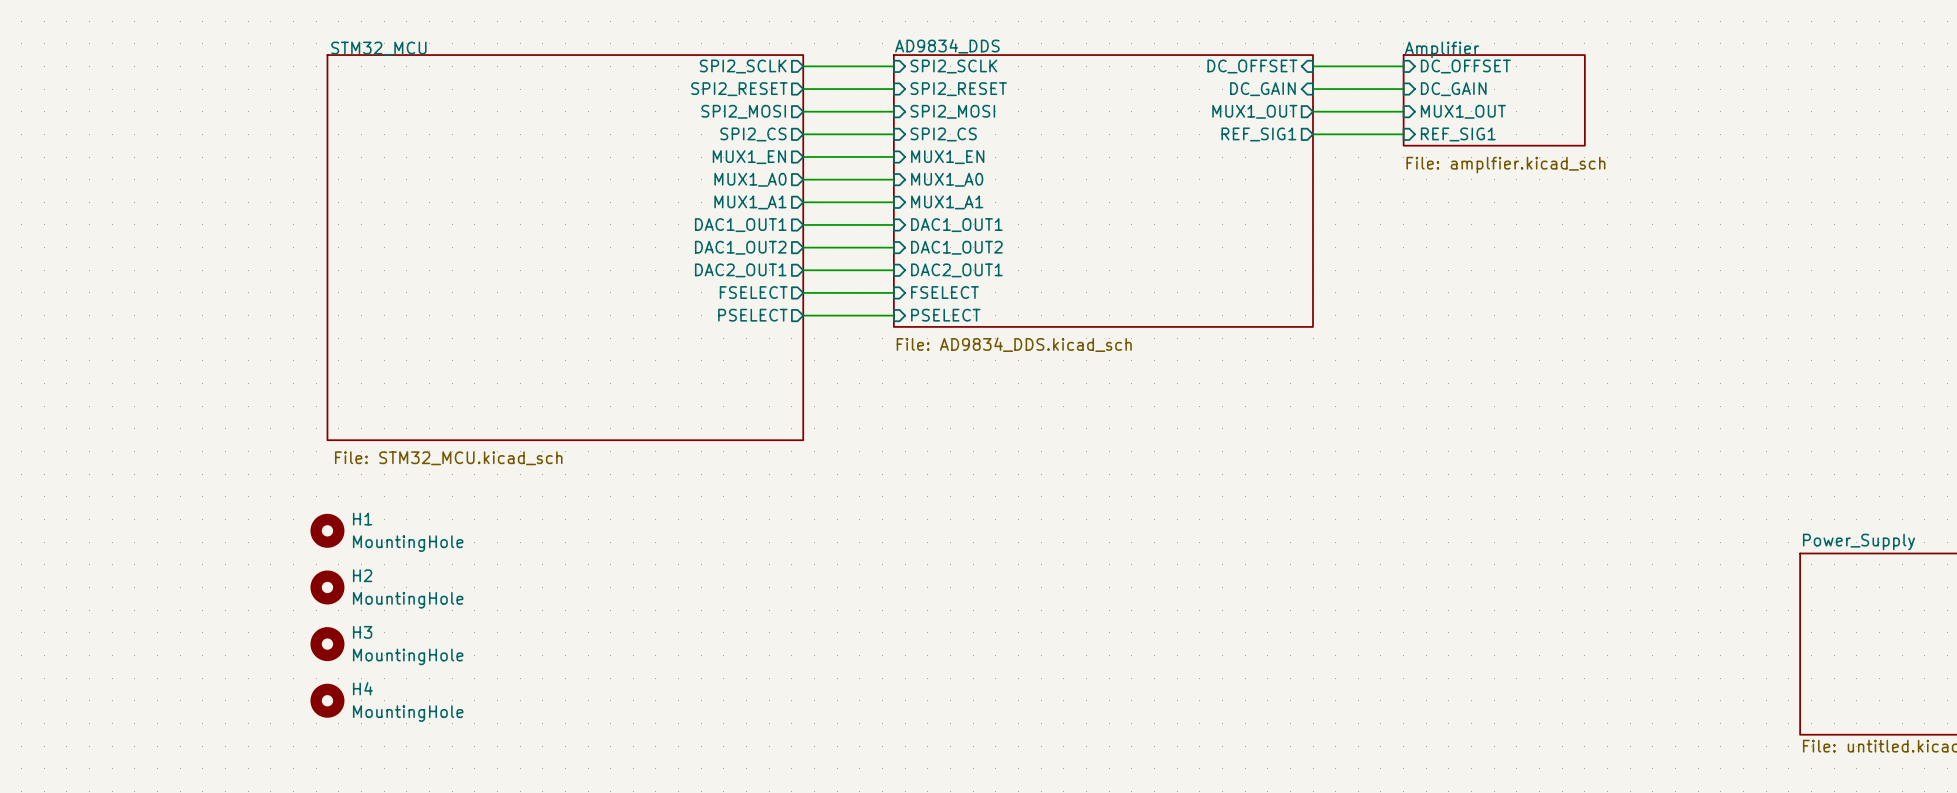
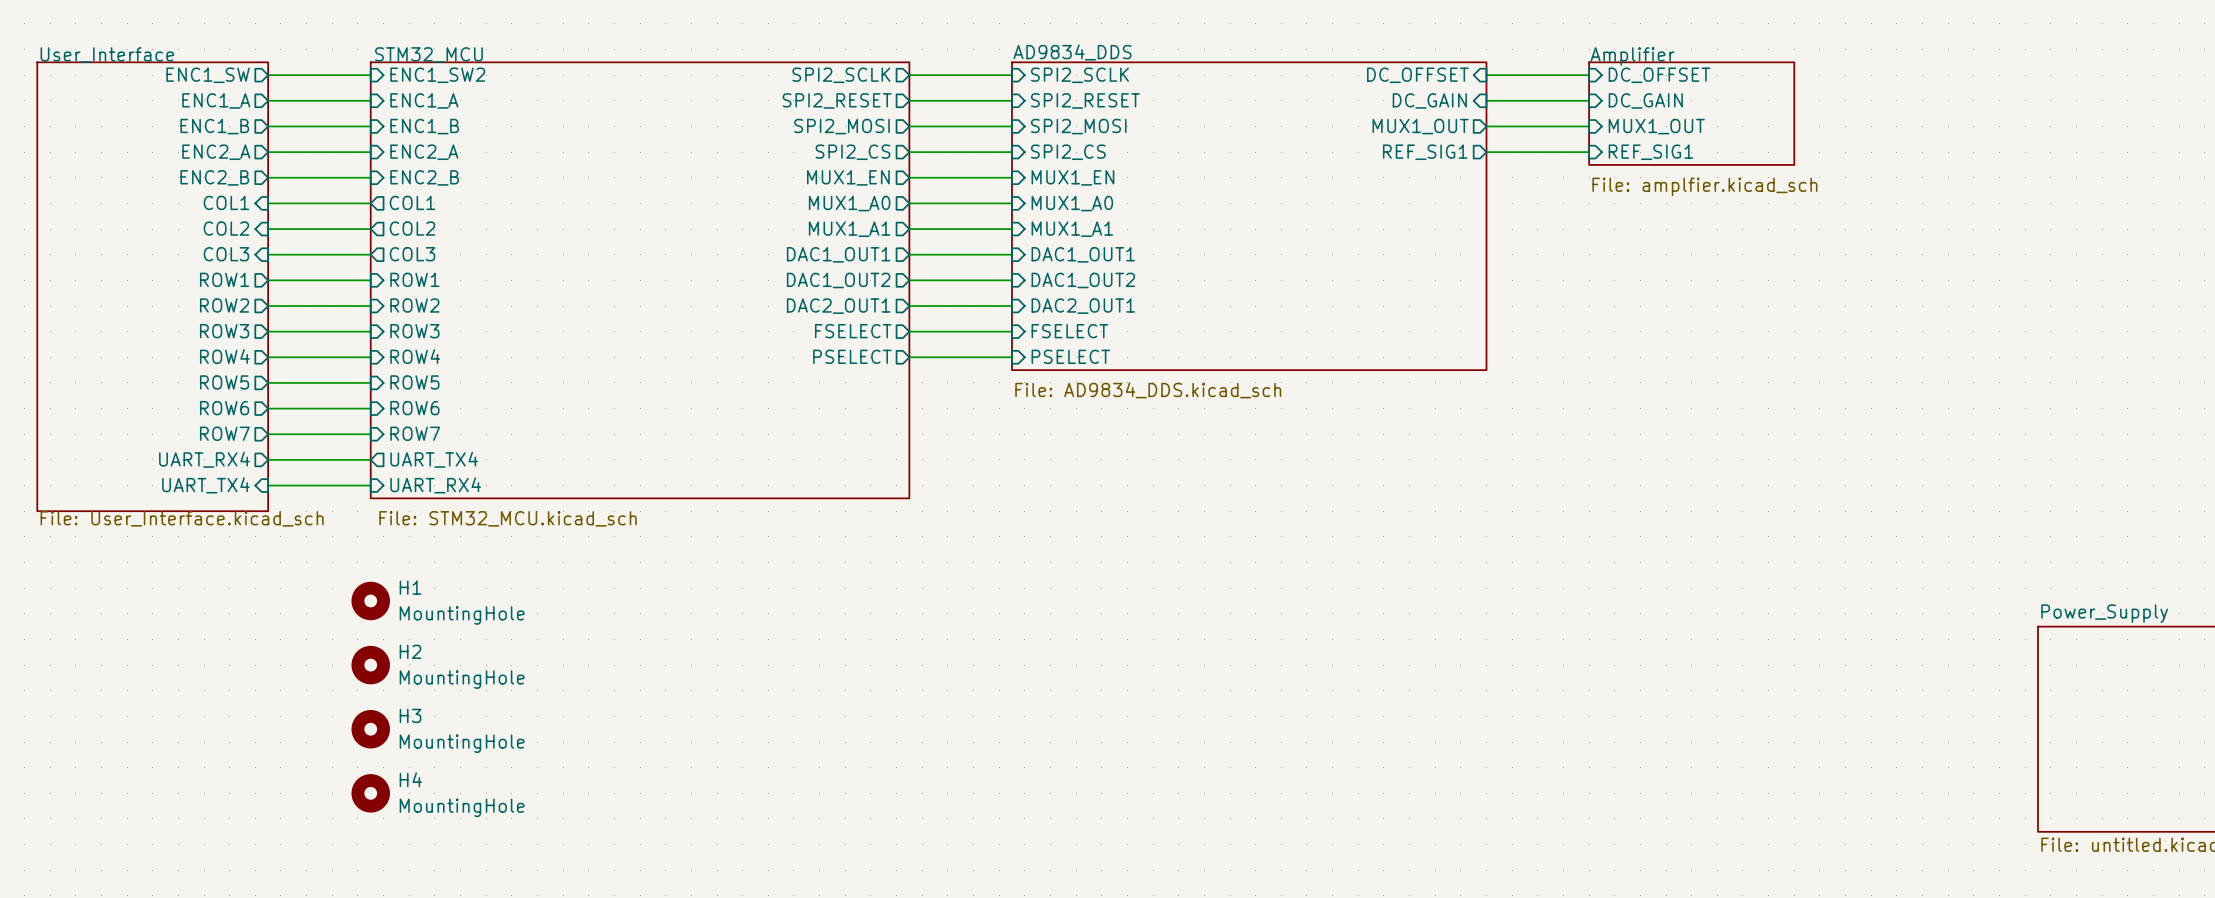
sheet pin: none -> ENC1_SW (208, 75)
wire: none -> (268, 75) (370, 75)
sheet pin: none -> ENC1_SW2 (437, 75)
sheet pin: none -> ENC1_A (216, 100)
wire: none -> (268, 100) (370, 100)
sheet pin: none -> ENC1_A (424, 100)
sheet pin: none -> ENC1_B (214, 126)
wire: none -> (268, 126) (370, 126)
sheet pin: none -> ENC1_B (424, 126)
sheet pin: none -> ENC2_A (216, 152)
wire: none -> (268, 152) (370, 152)
sheet pin: none -> ENC2_A (424, 152)
sheet pin: none -> ENC2_B (214, 177)
wire: none -> (268, 177) (370, 177)
sheet pin: none -> ENC2_B (424, 177)
sheet pin: none -> COL1 (226, 202)
wire: none -> (268, 203) (370, 203)
sheet pin: none -> COL1 (412, 202)
sheet pin: none -> COL2 (226, 228)
sheet pin: none -> COL2 (412, 228)
wire: none -> (268, 229) (370, 229)
sheet pin: none -> COL3 (226, 254)
wire: none -> (268, 254) (370, 254)
sheet pin: none -> COL3 (412, 254)
sheet pin: none -> ROW1 (224, 279)
wire: none -> (268, 280) (370, 280)
sheet pin: none -> ROW1 (414, 279)
sheet User_Interface: none -> File: User_Interface.kicad_sch (152, 286)
sheet pin: none -> ROW2 (224, 305)
sheet pin: none -> ROW2 (414, 305)
wire: none -> (268, 306) (370, 306)
sheet pin: none -> ROW3 (224, 331)
wire: none -> (268, 331) (370, 331)
sheet pin: none -> ROW3 (414, 331)
sheet pin: none -> ROW4 (224, 356)
sheet pin: none -> ROW4 (415, 356)
wire: none -> (268, 357) (370, 357)
sheet pin: none -> ROW5 (224, 382)
sheet pin: none -> ROW5 (414, 382)
wire: none -> (268, 382) (370, 382)
sheet pin: none -> ROW6 (224, 408)
wire: none -> (268, 408) (370, 408)
sheet pin: none -> ROW6 (414, 408)
sheet pin: none -> ROW7 (224, 433)
wire: none -> (268, 434) (370, 434)
sheet pin: none -> ROW7 (415, 433)
sheet pin: none -> UART_RX4 (204, 459)
wire: none -> (268, 459) (370, 459)
sheet pin: none -> UART_TX4 (434, 459)
sheet pin: none -> UART_TX4 (205, 485)
wire: none -> (268, 485) (370, 485)
sheet pin: none -> UART_RX4 (435, 485)

